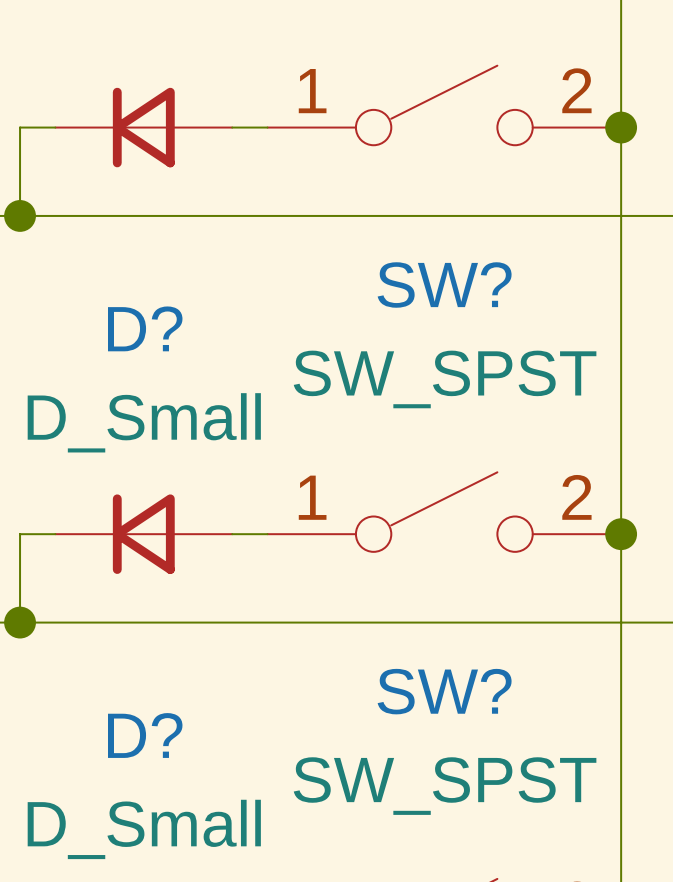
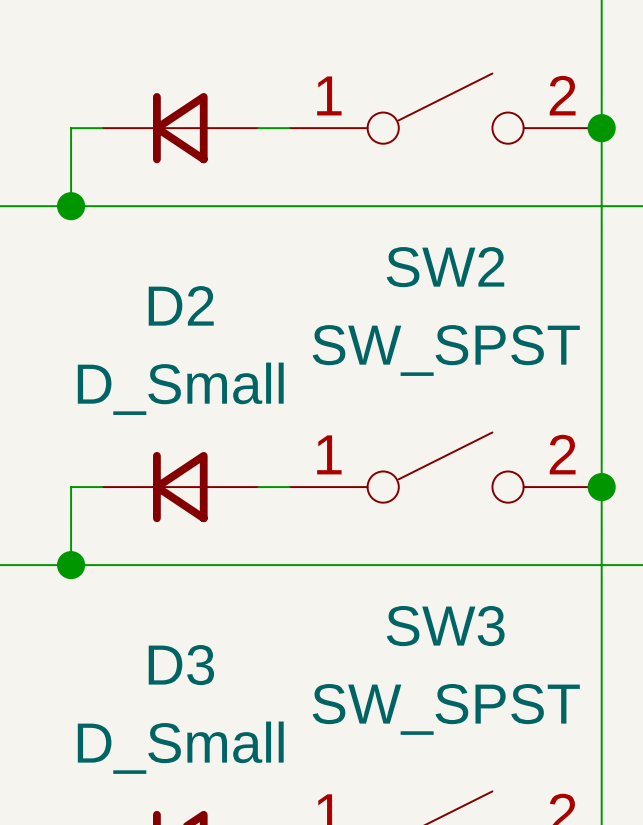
SW? name: SW? (444, 285) -> SW2 (445, 267)
D? name: D? (145, 328) -> D2 (181, 305)
SW? name: SW? (444, 691) -> SW3 (445, 626)
D? name: D? (145, 735) -> D3 (181, 665)

